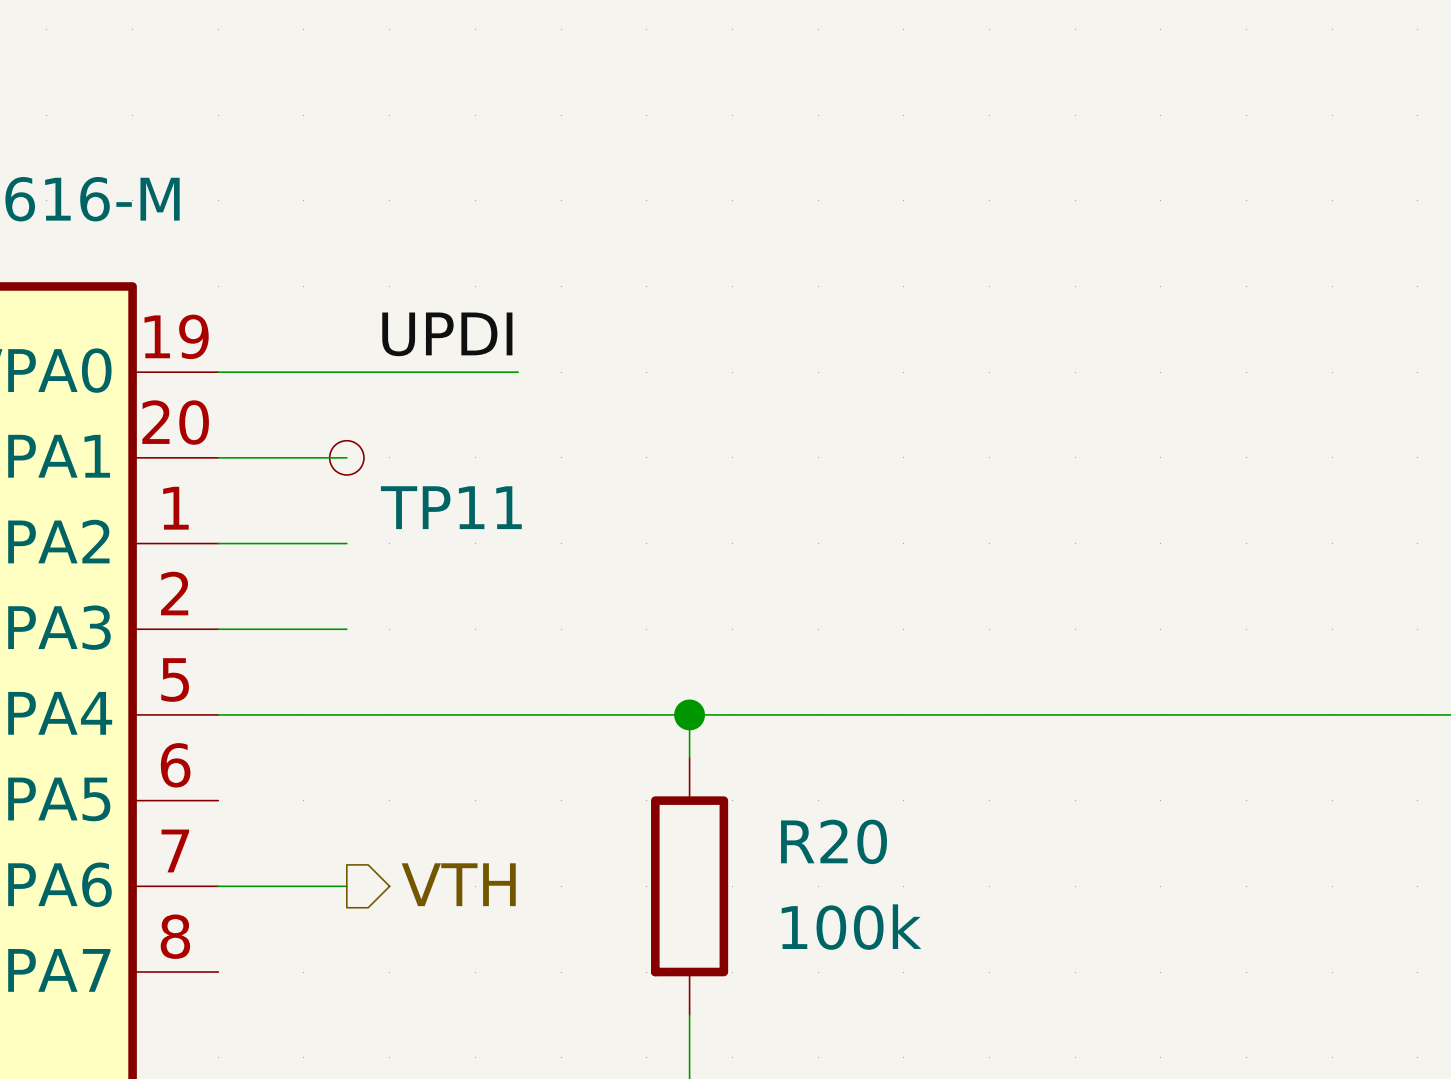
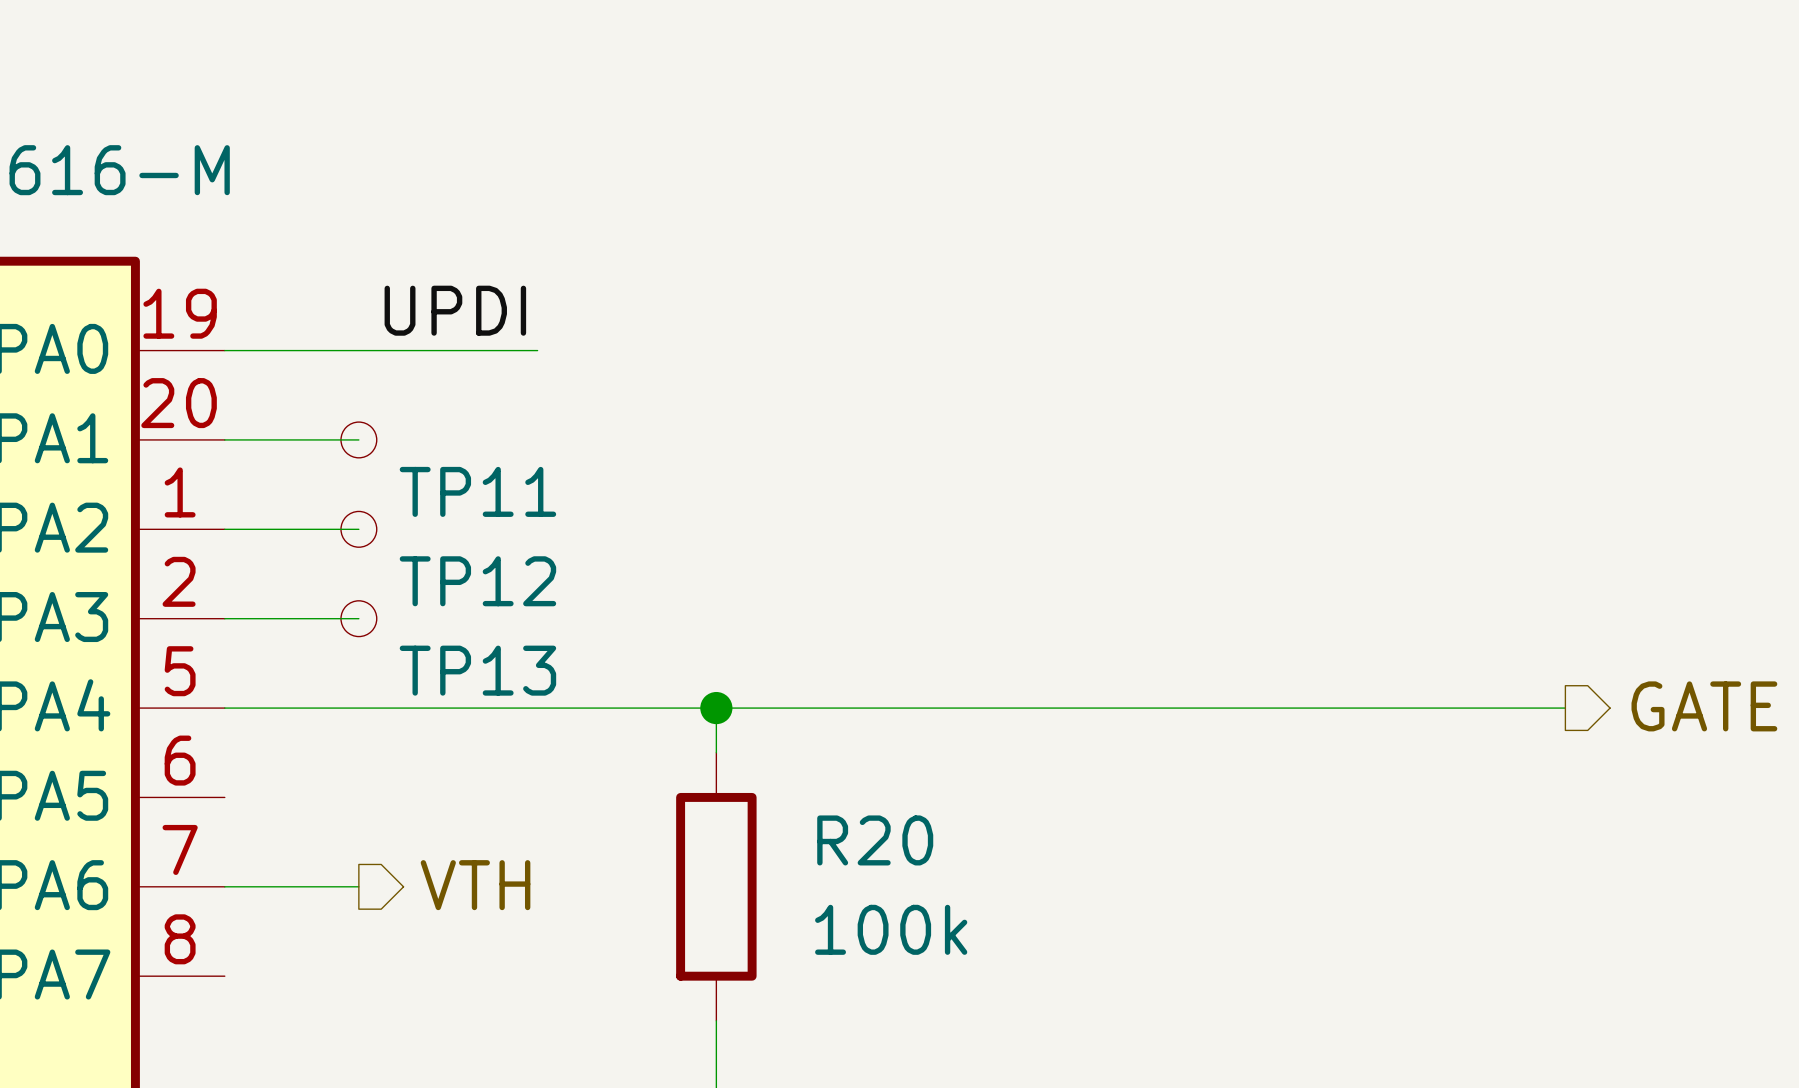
TP12: none -> (358, 529)
TP13: none -> (358, 618)

